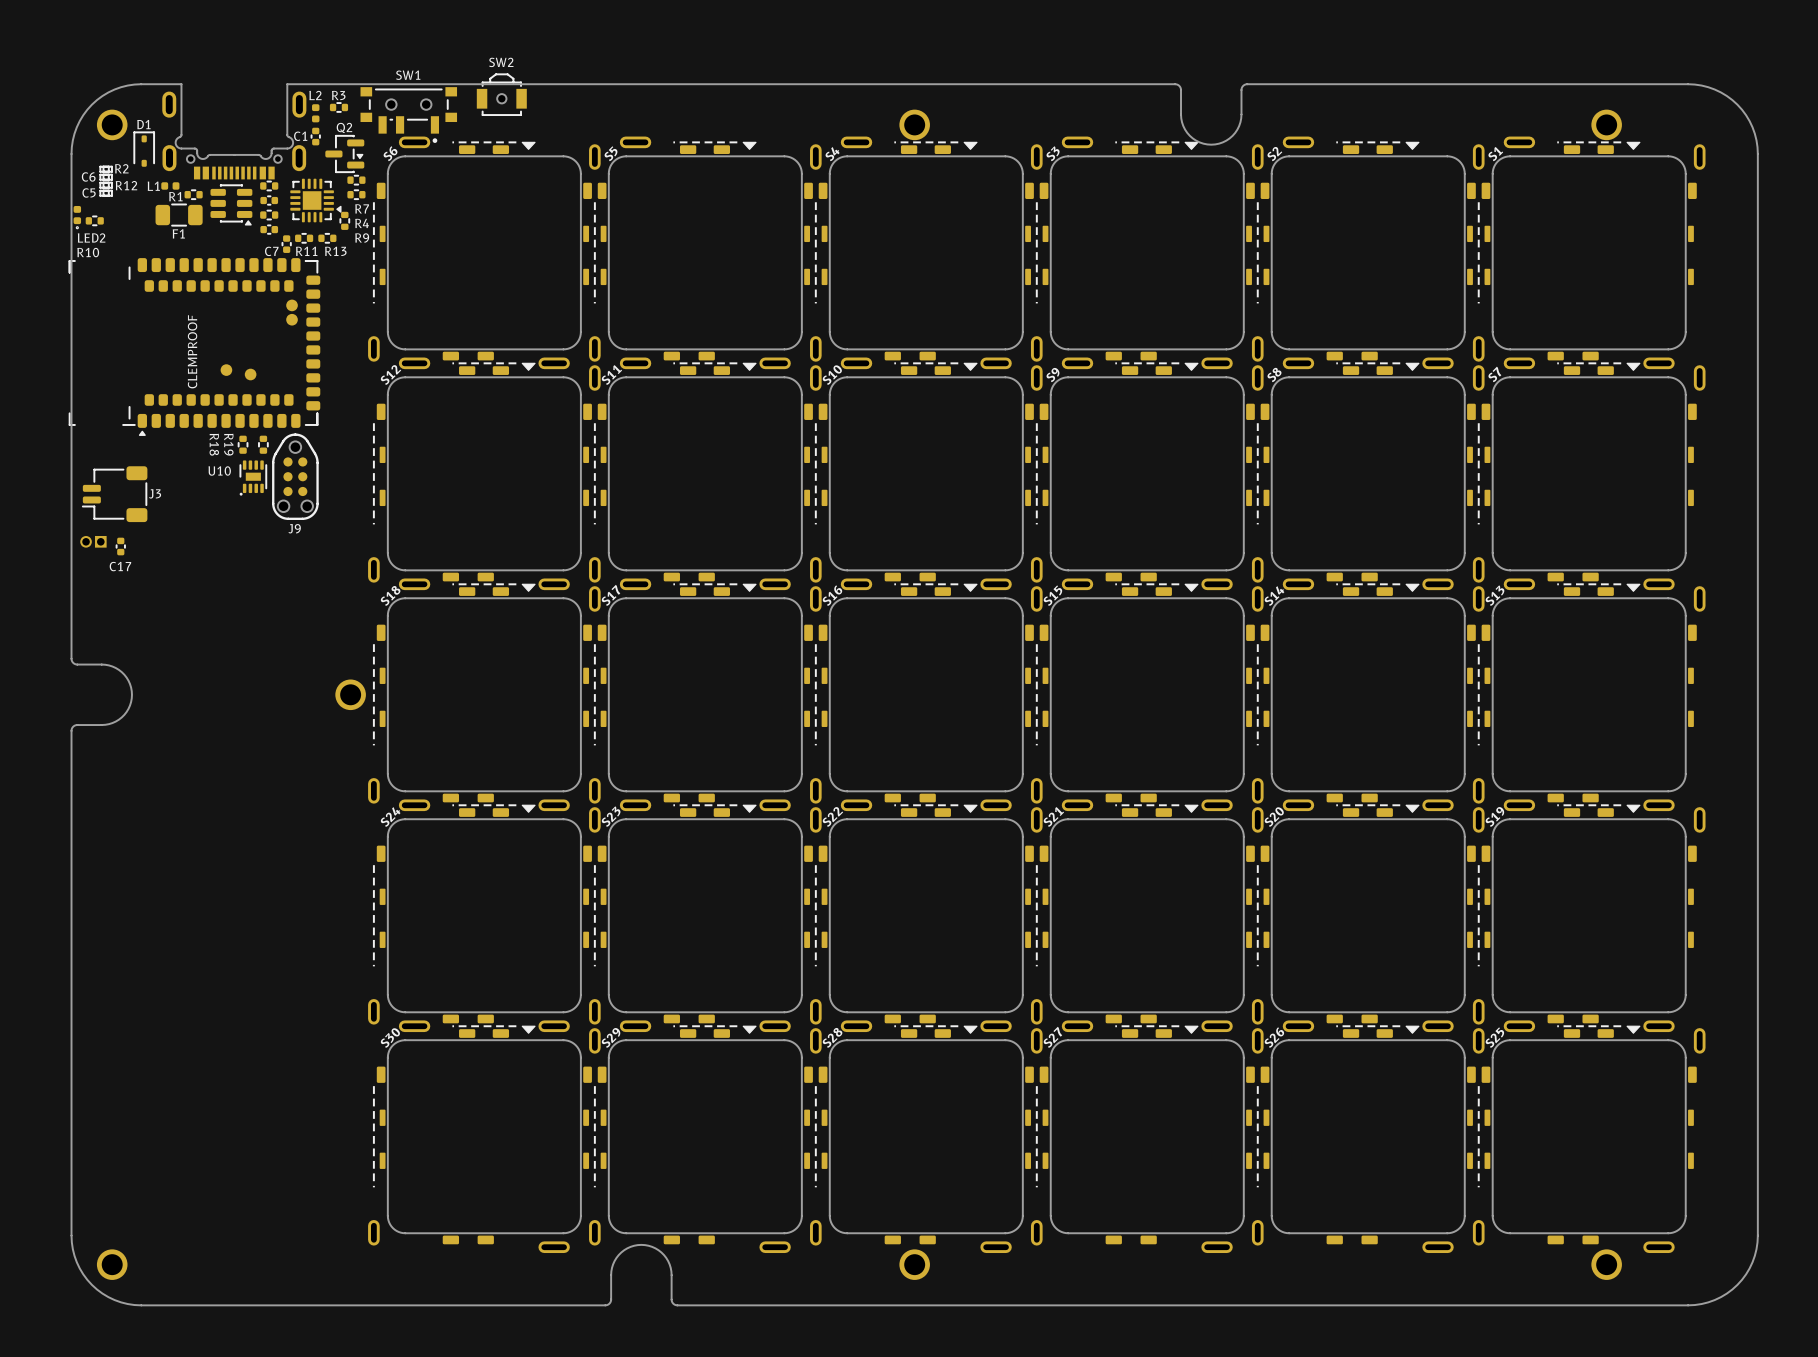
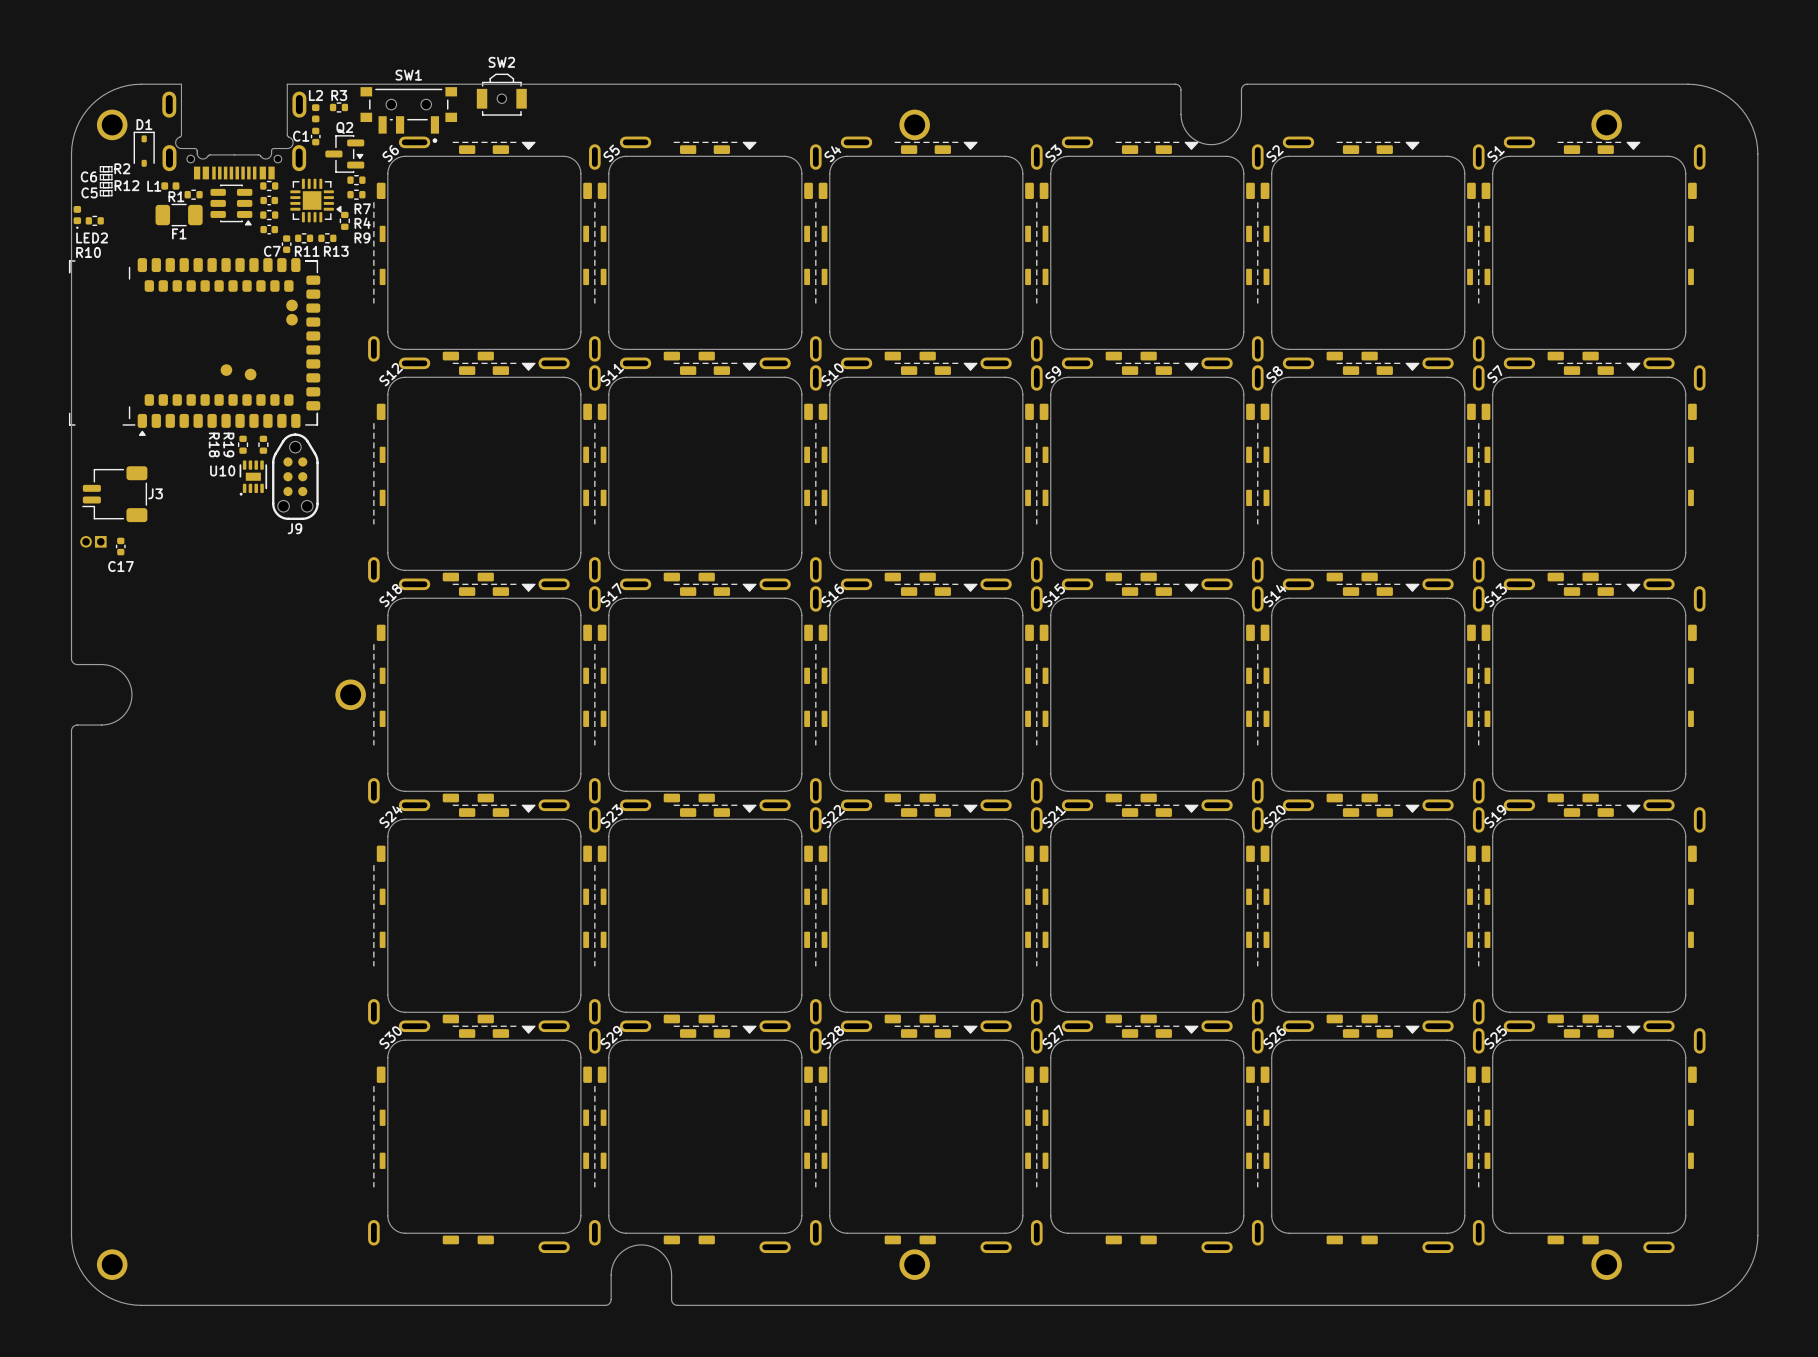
text: CLEMPROOF (192, 351) -> none

